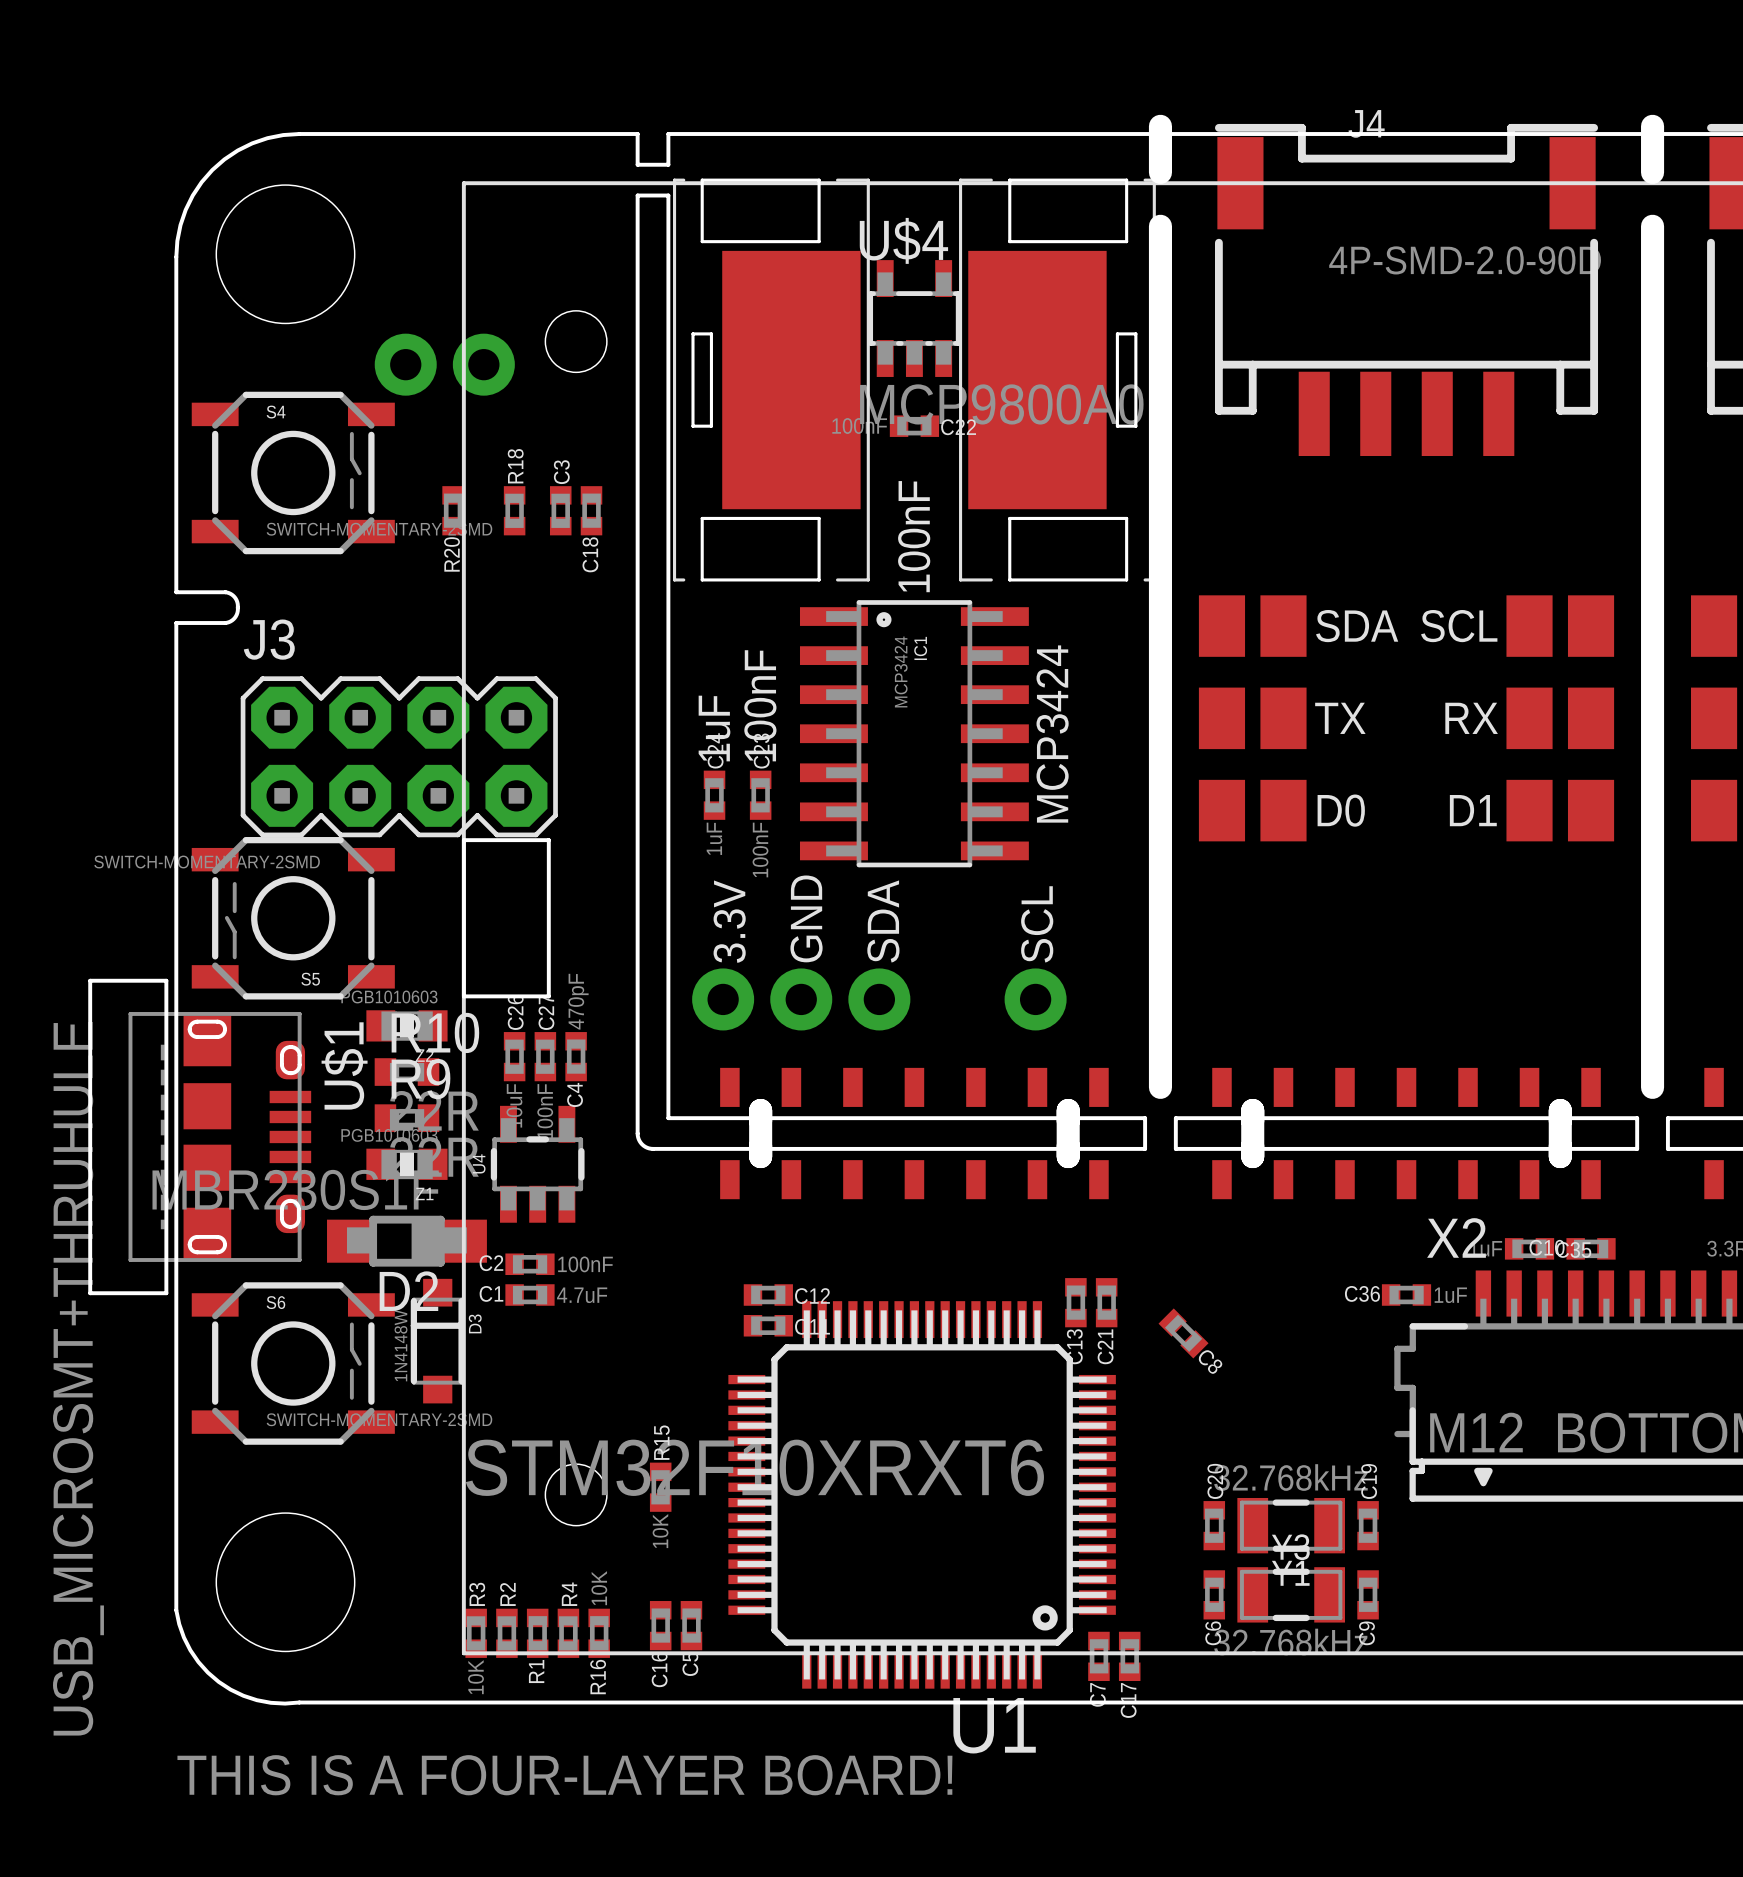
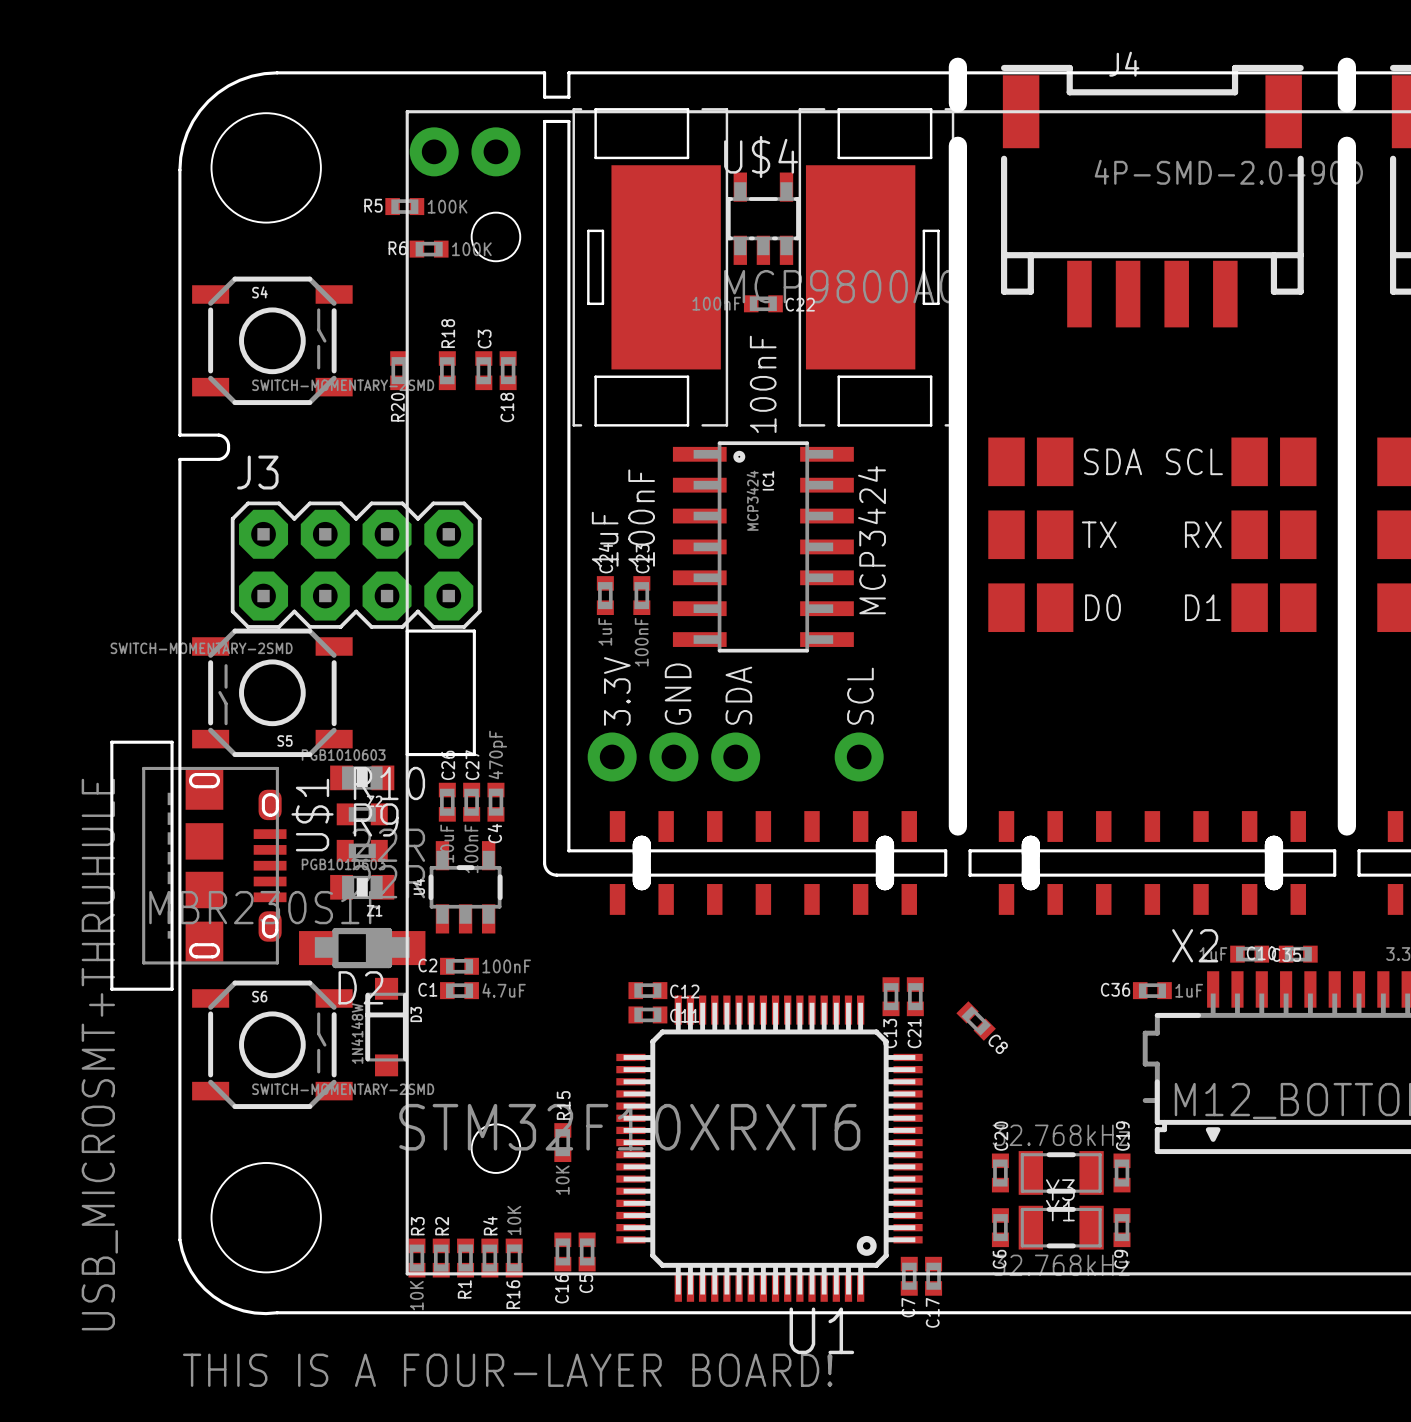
R5: none -> 100K (404, 206)
R6: none -> 100K (429, 249)
part position: (444, 364) -> (465, 151)

